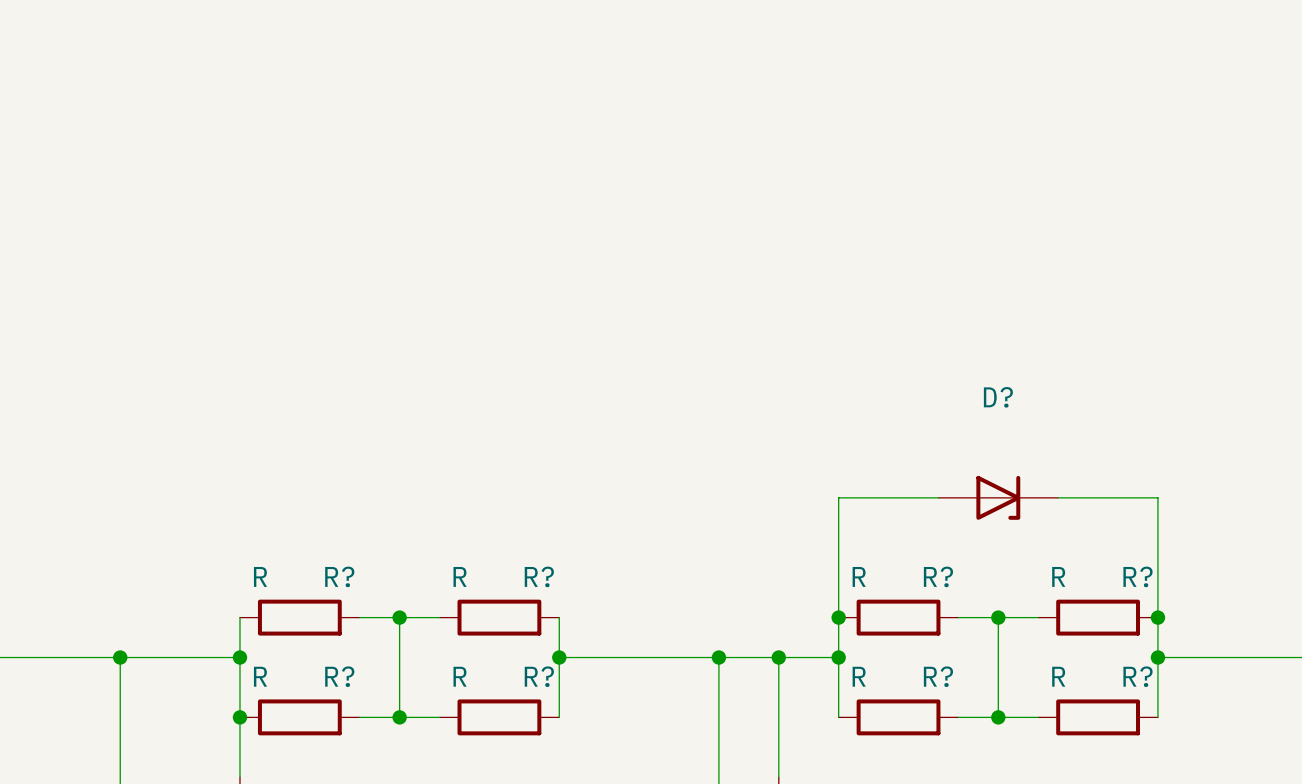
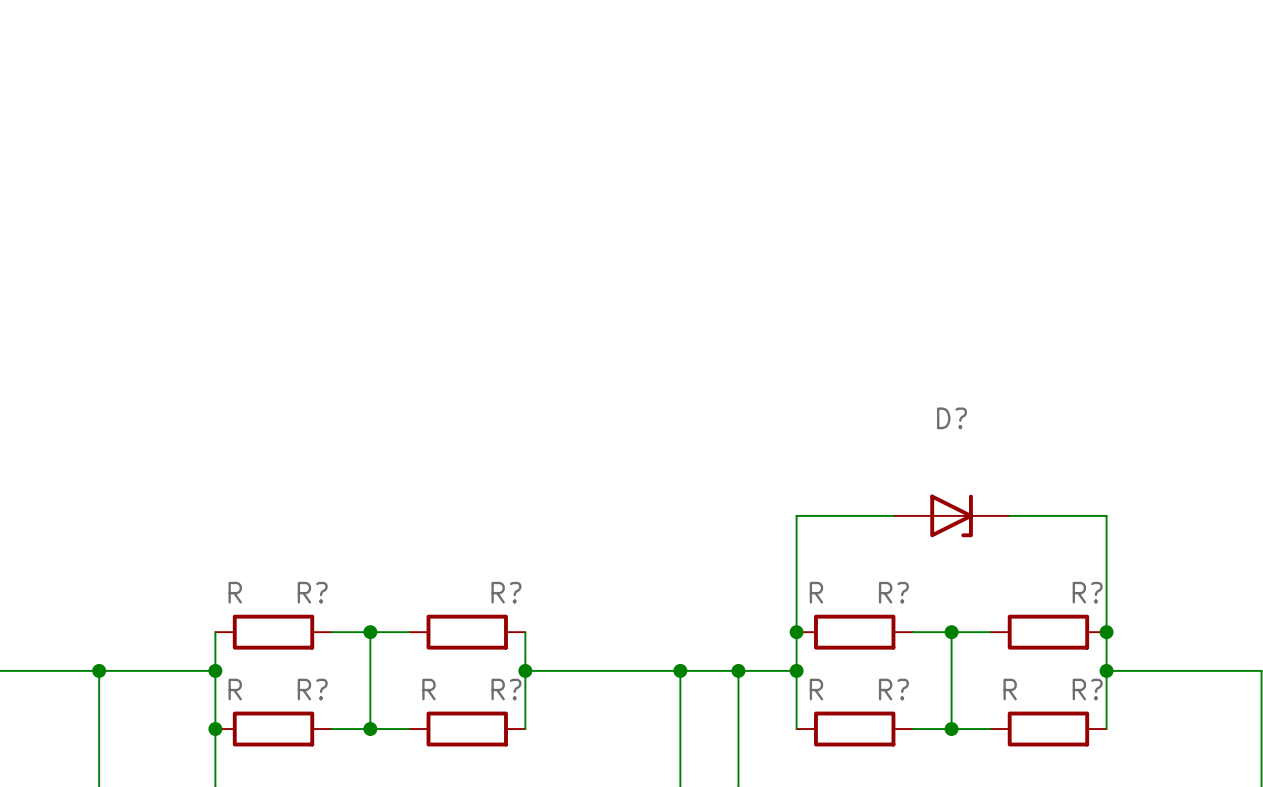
R? value: R (460, 576) -> none
R? value: R (1058, 576) -> none

